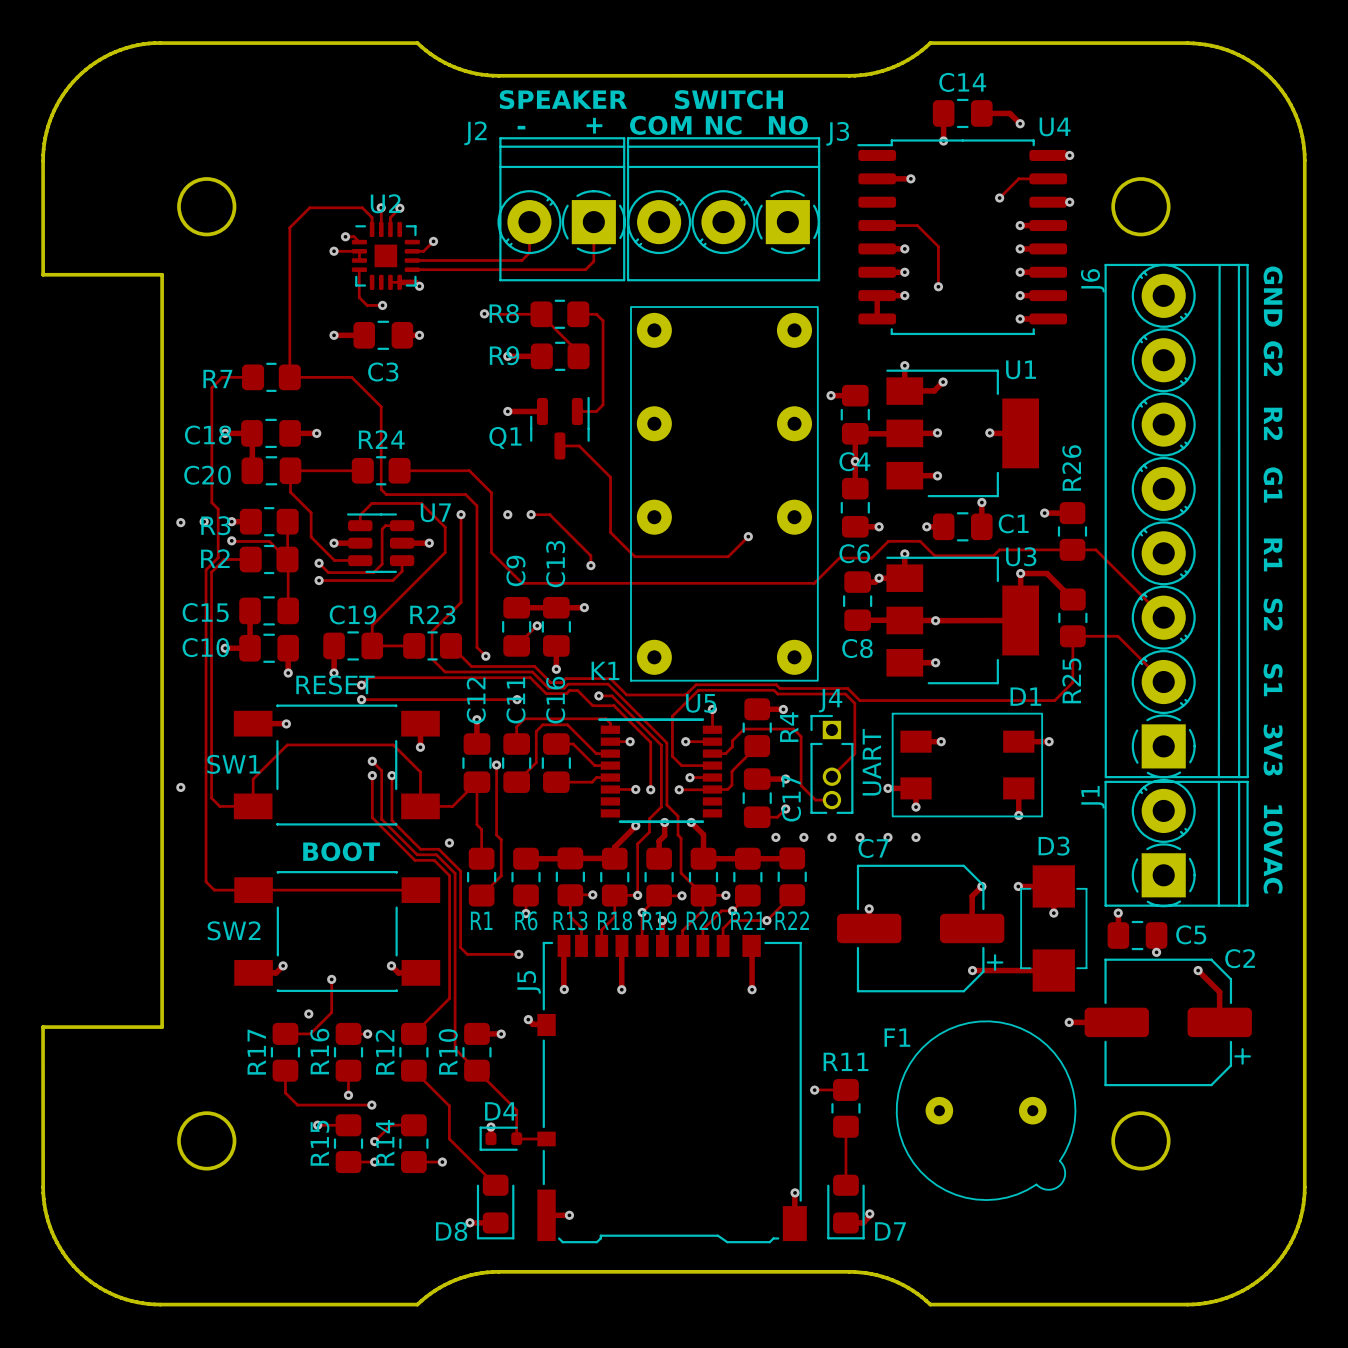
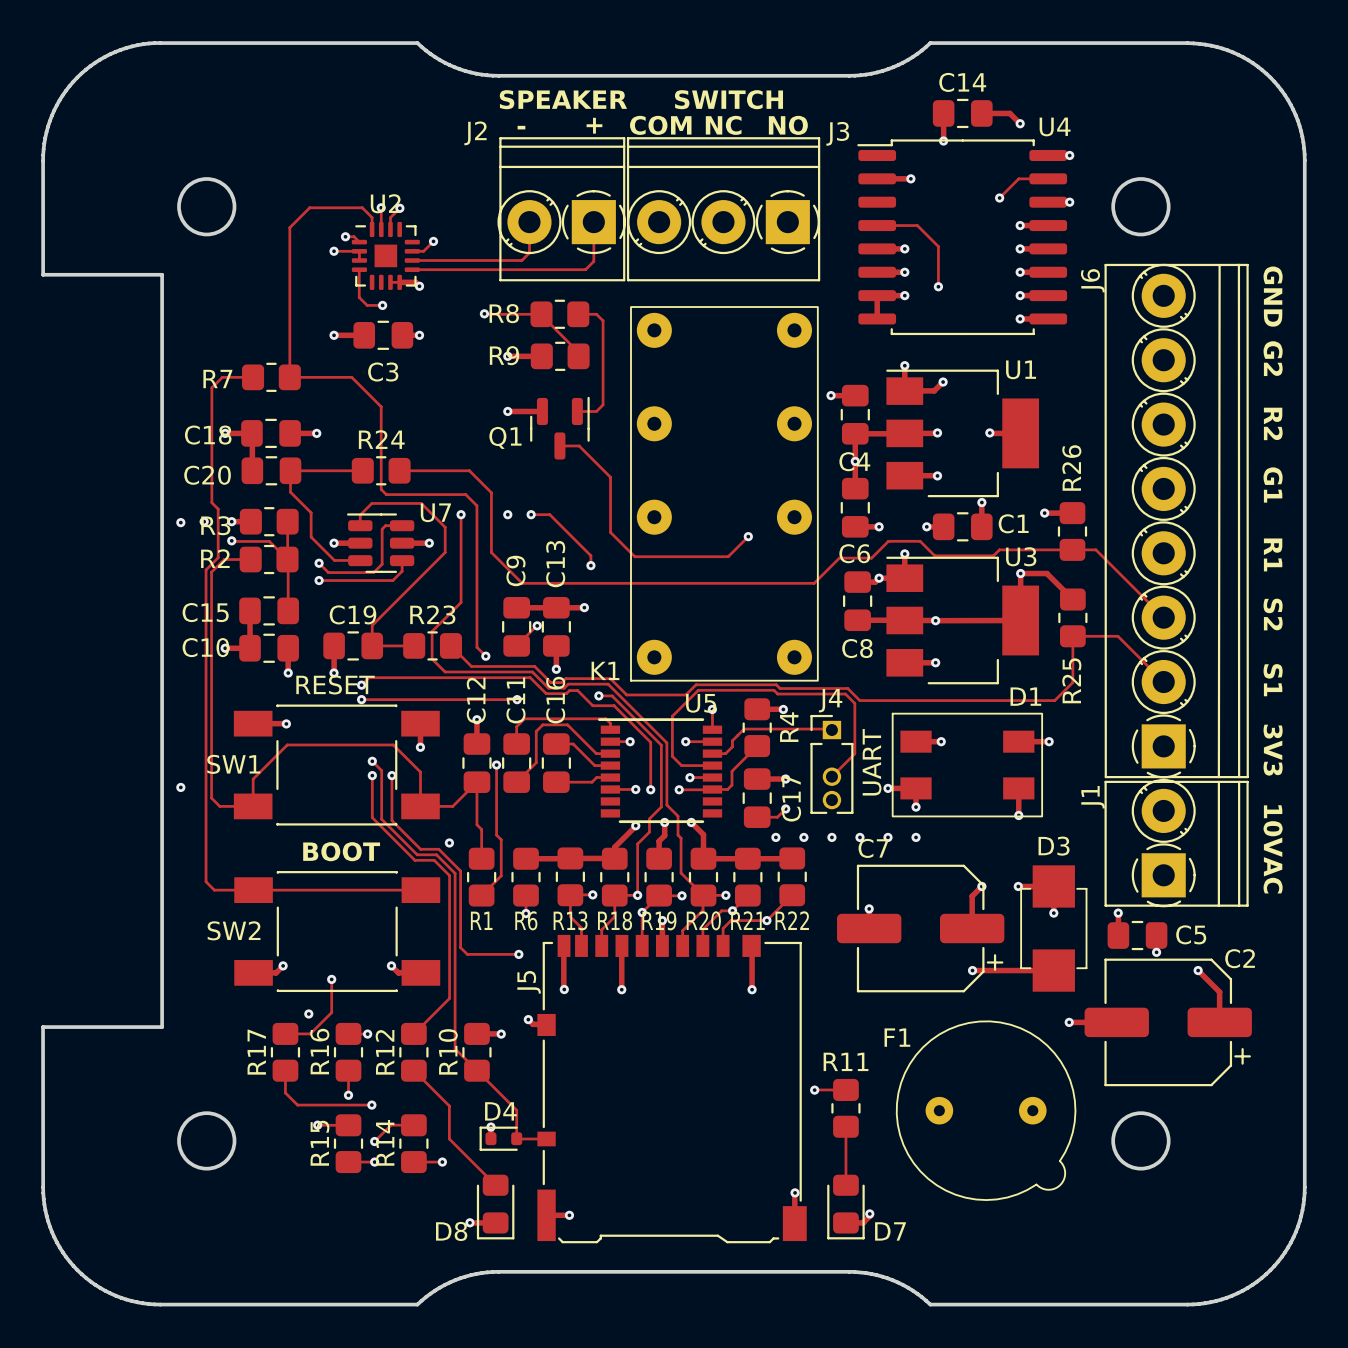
track: (793, 729) (801, 736) (801, 785) (815, 800) (831, 800) -> (793, 729) (831, 730)

